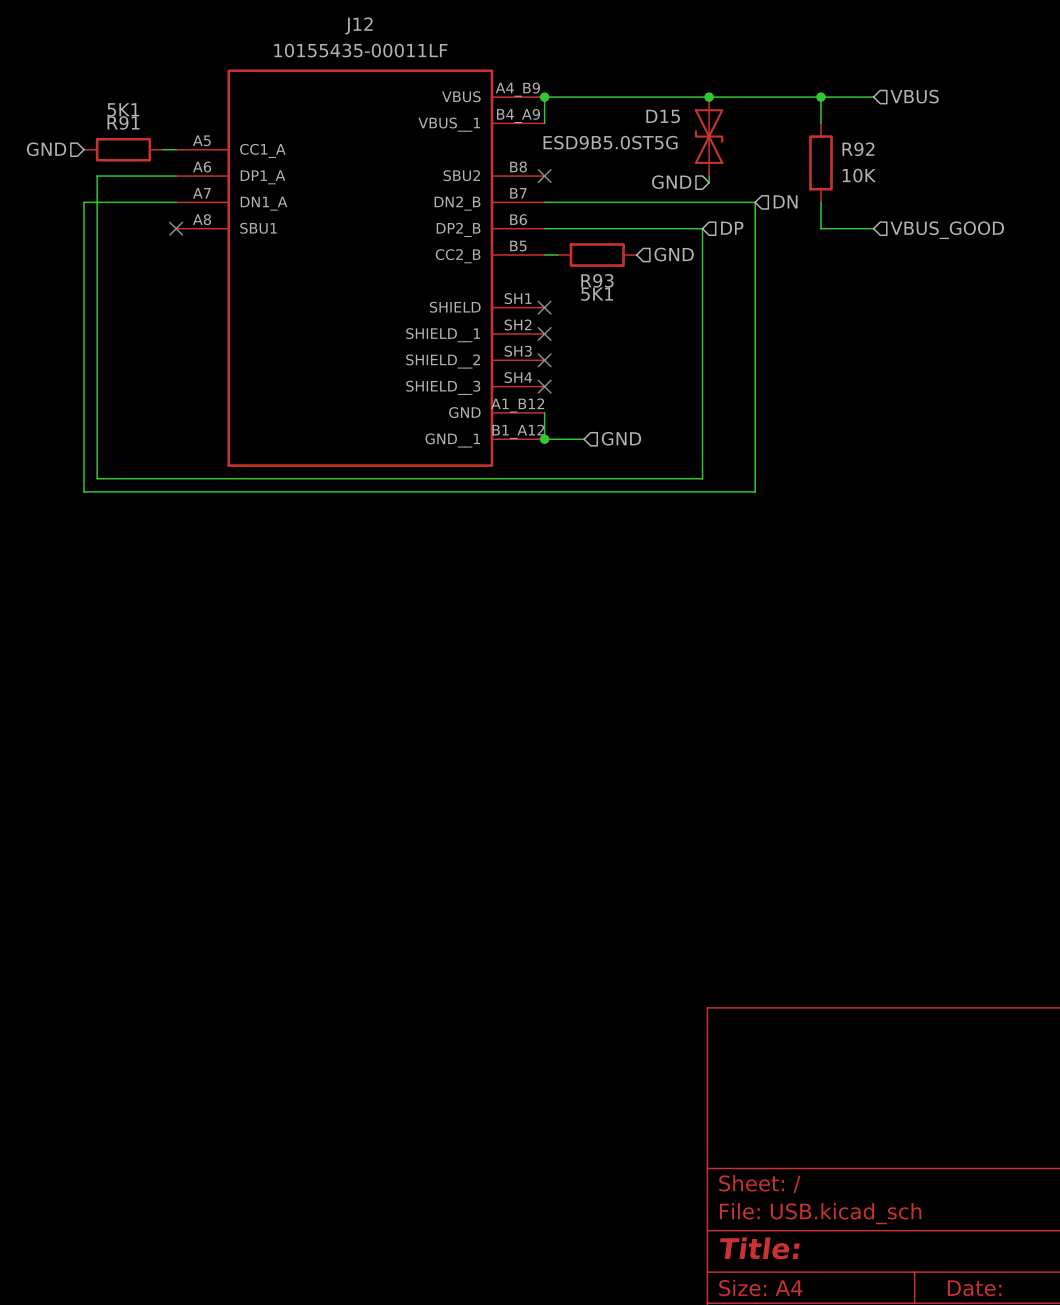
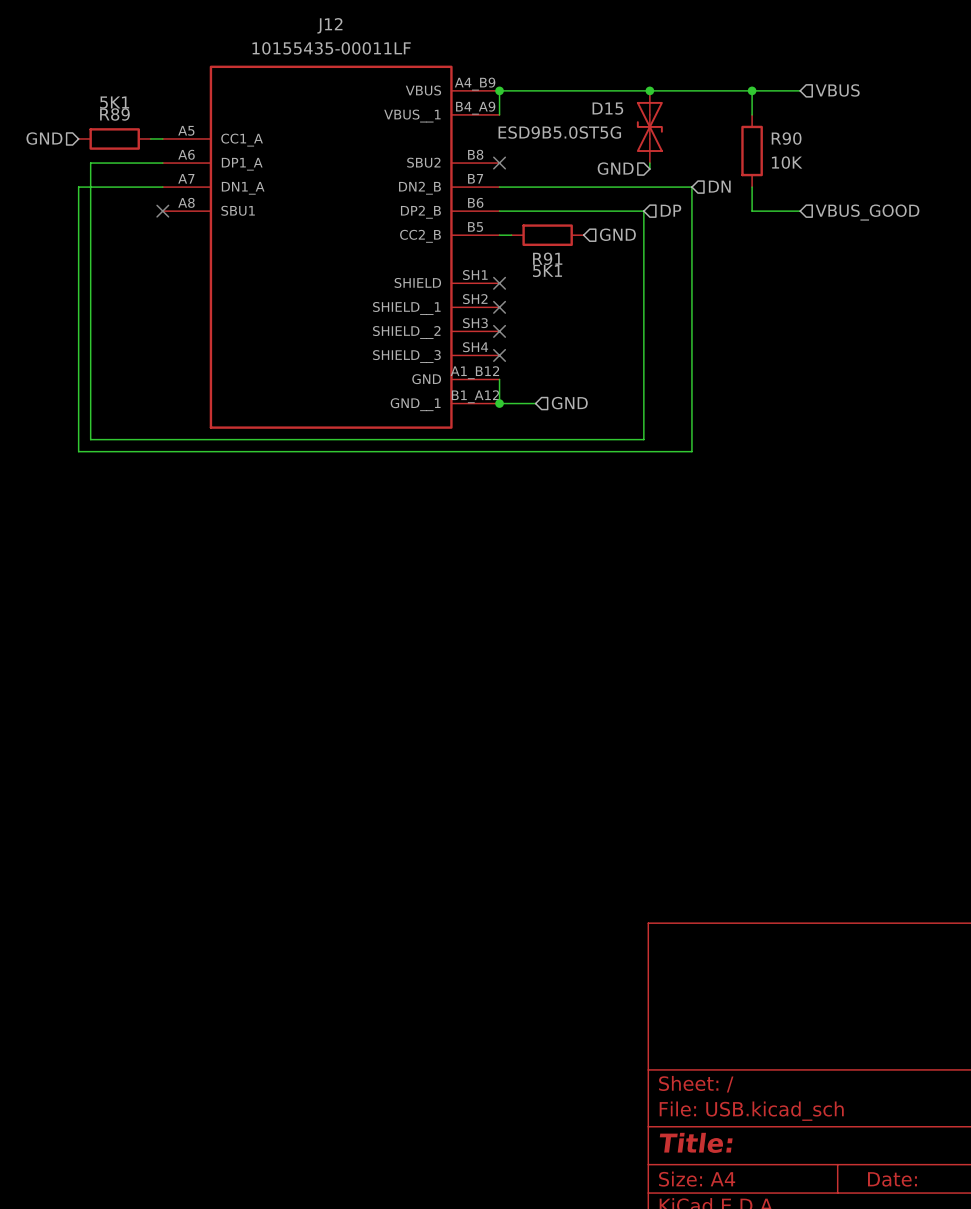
R91 name: R91 (123, 122) -> R89 (114, 114)
R92 name: R92 (858, 149) -> R90 (786, 138)
R93 name: R93 (597, 280) -> R91 (547, 258)

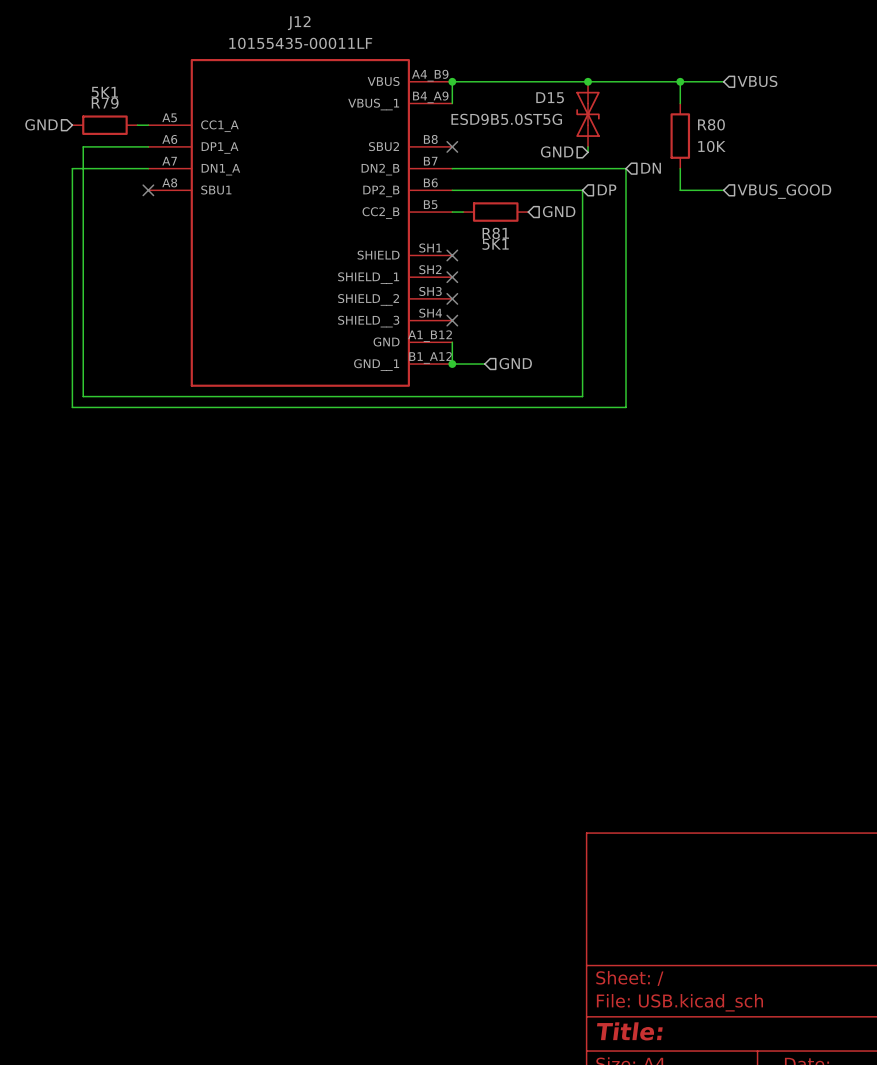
R89 name: R89 (114, 114) -> R79 (105, 103)
R90 name: R90 (786, 138) -> R80 (711, 124)
R91 name: R91 (547, 258) -> R81 (495, 233)

